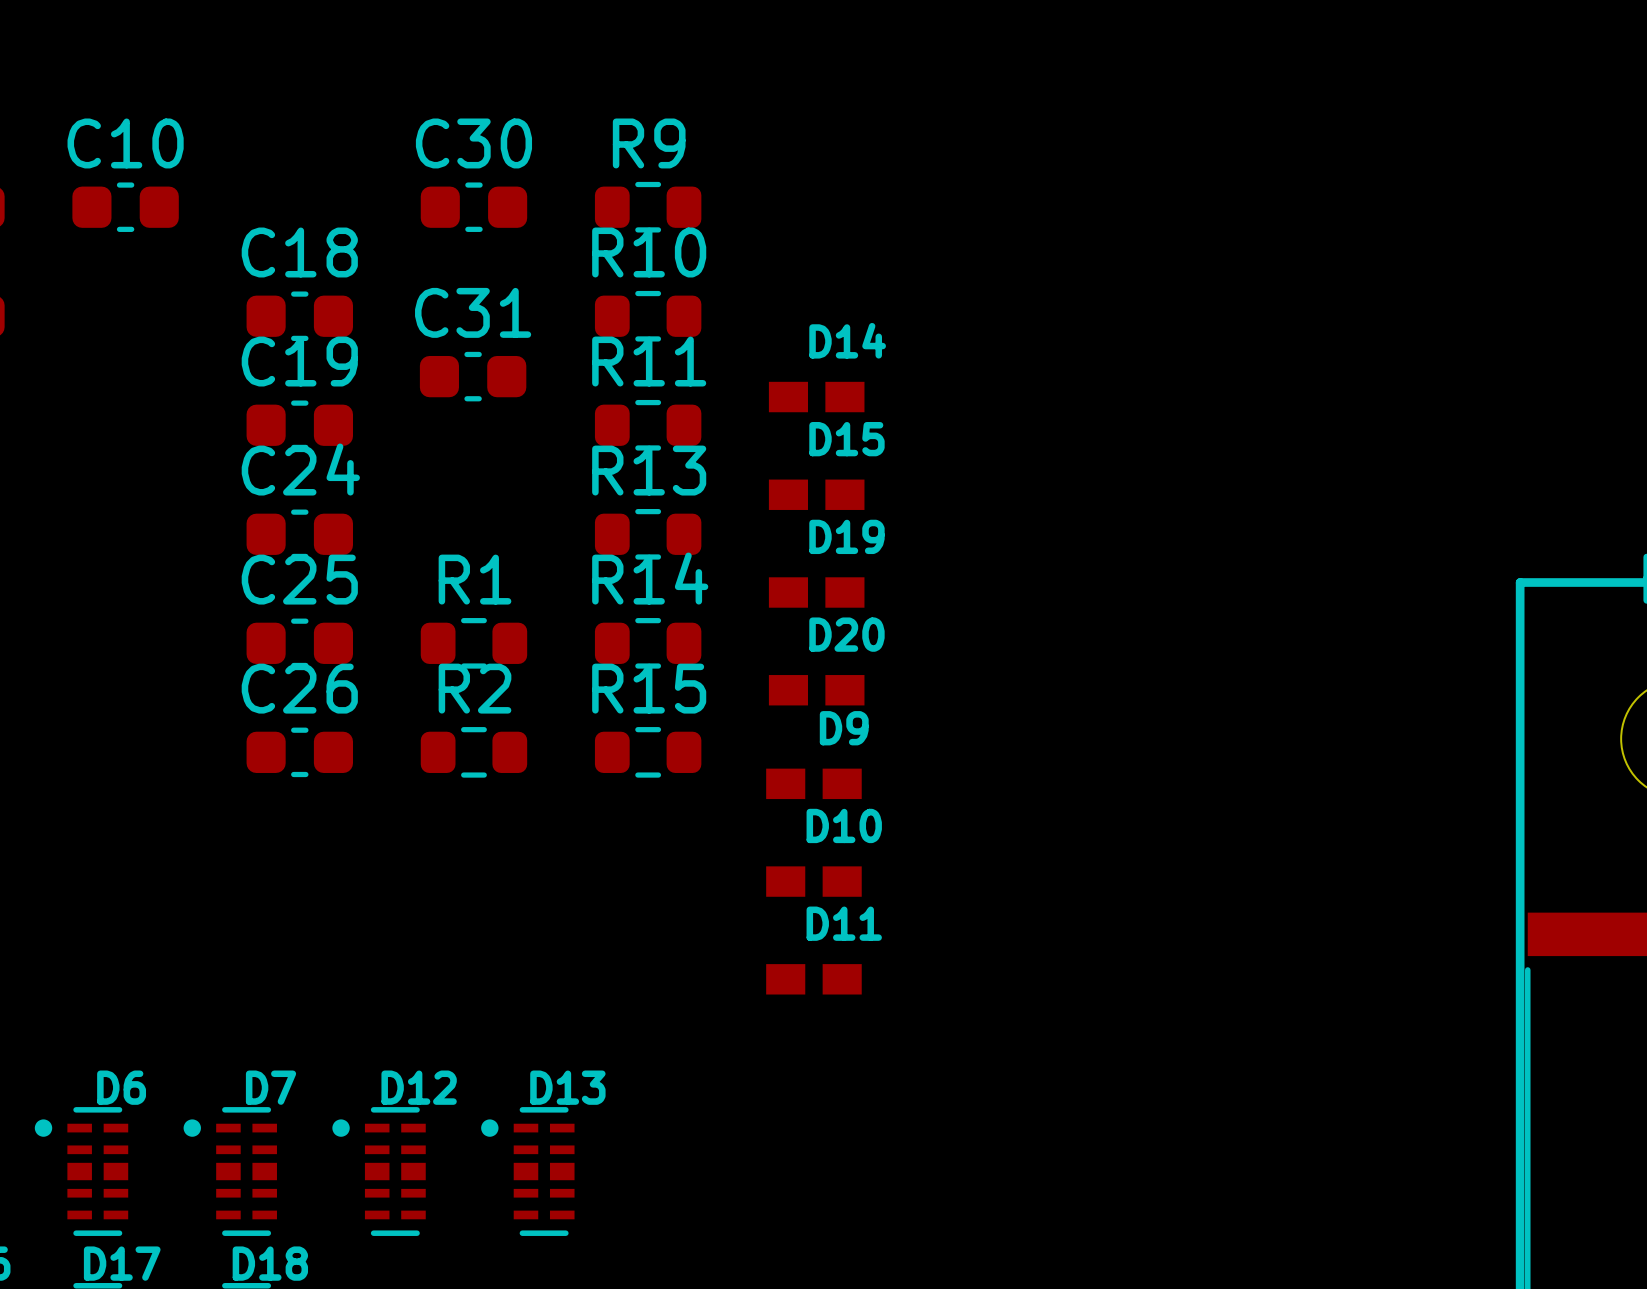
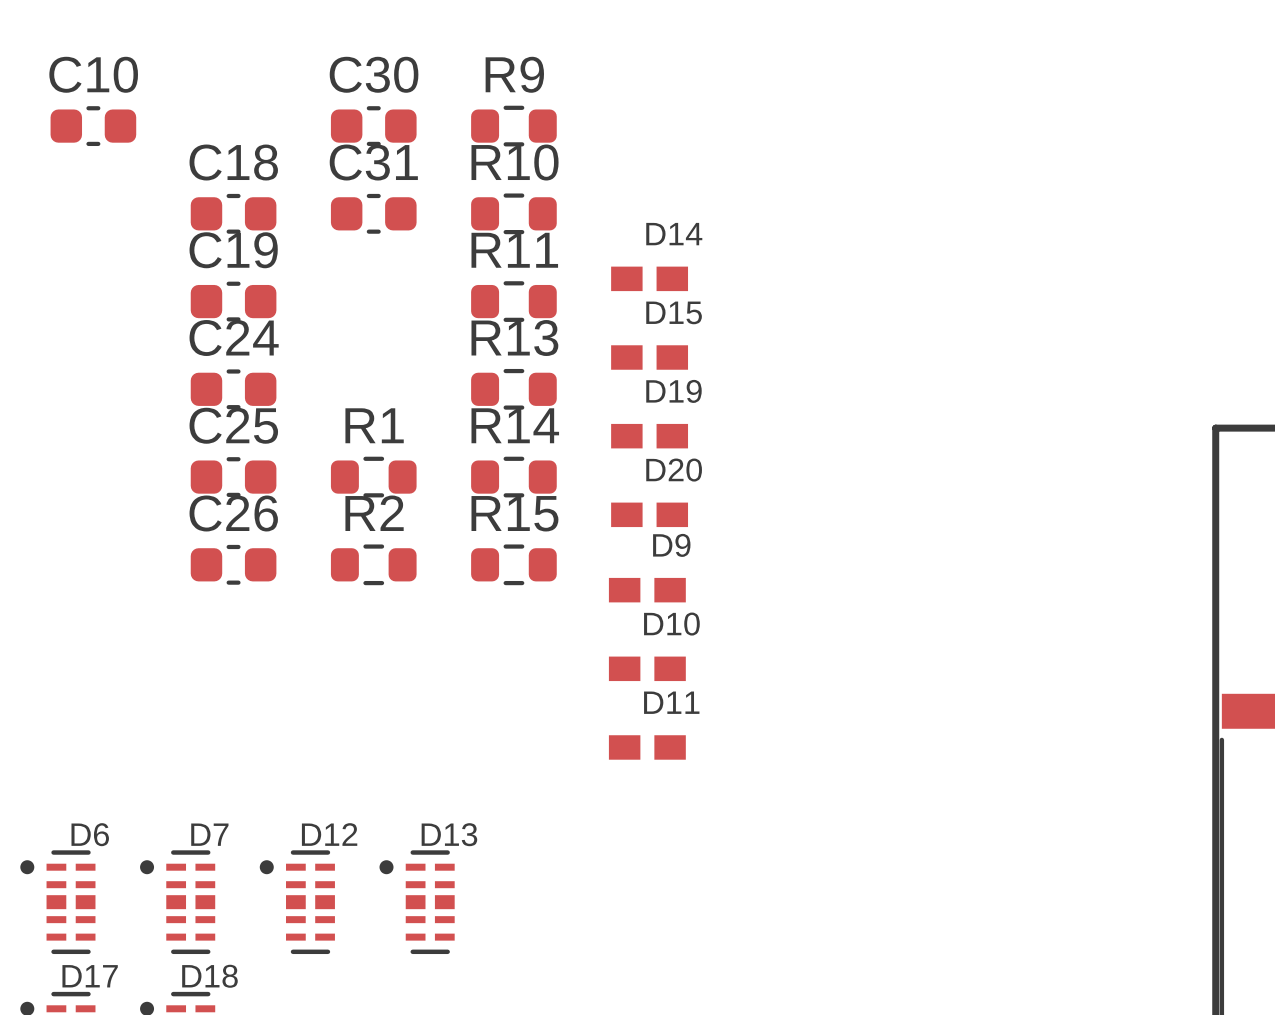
C31 position: (473, 376) -> (373, 213)

